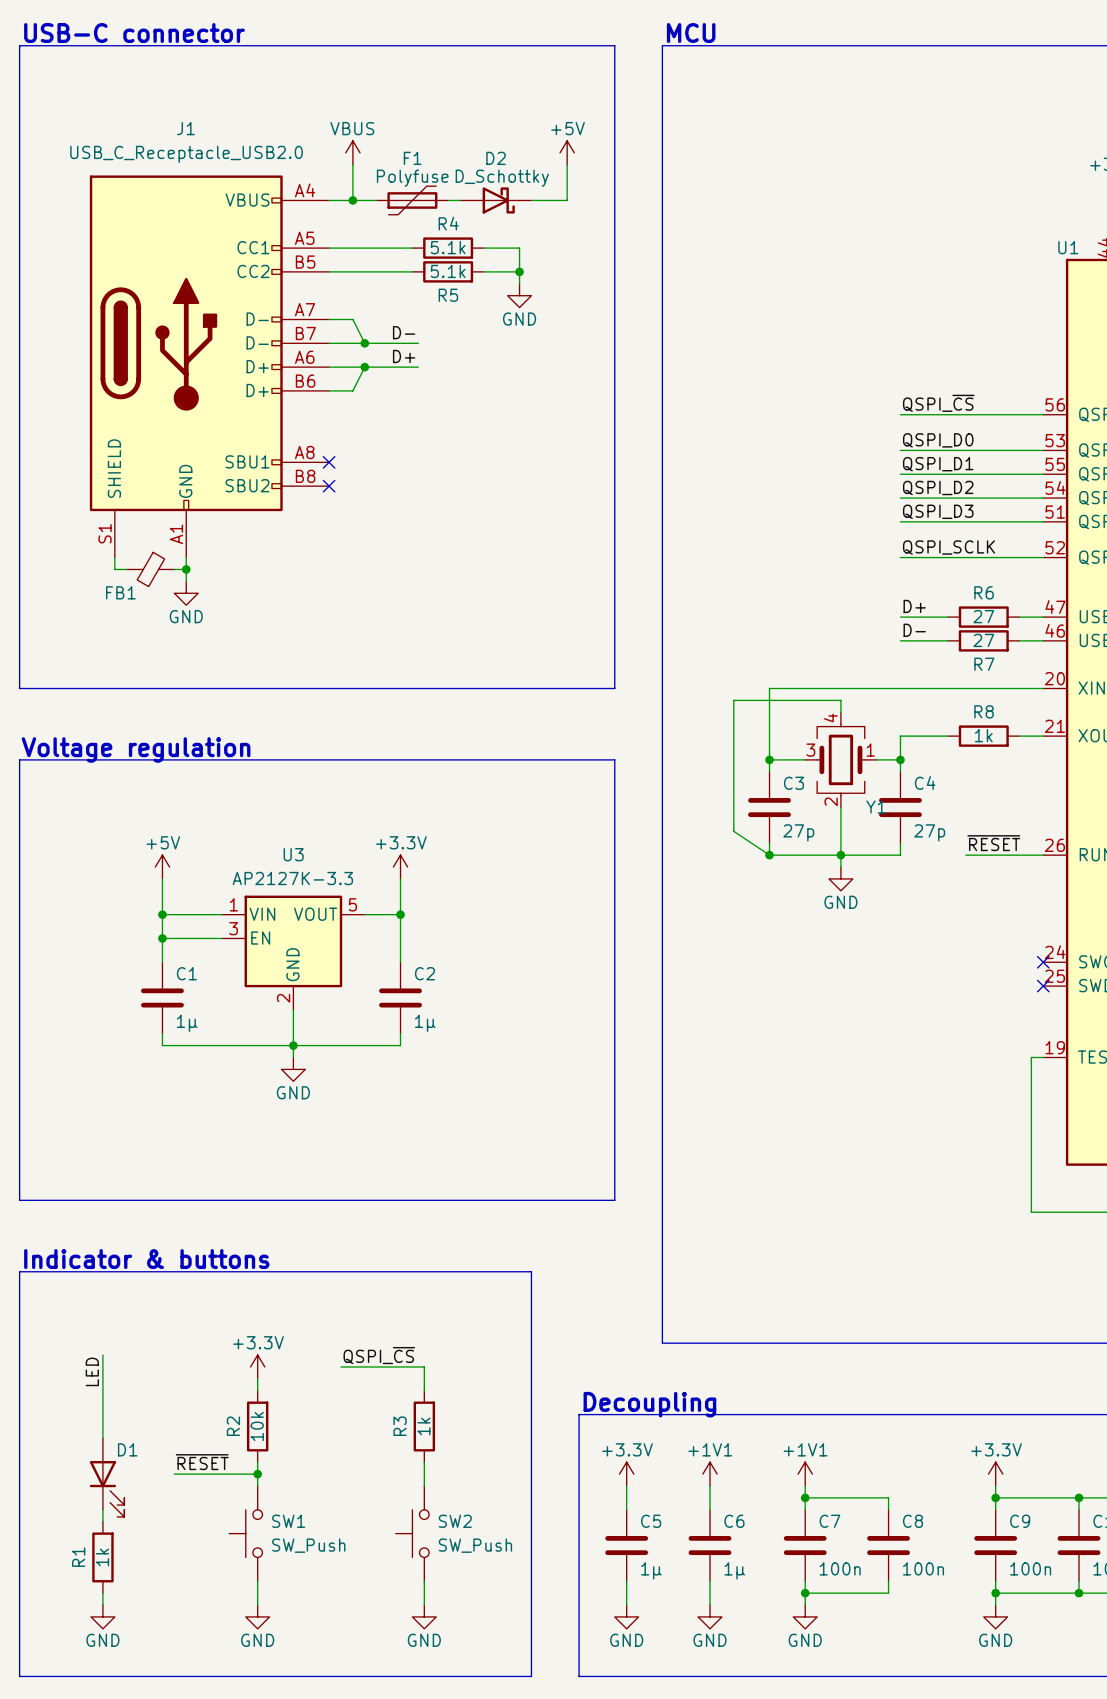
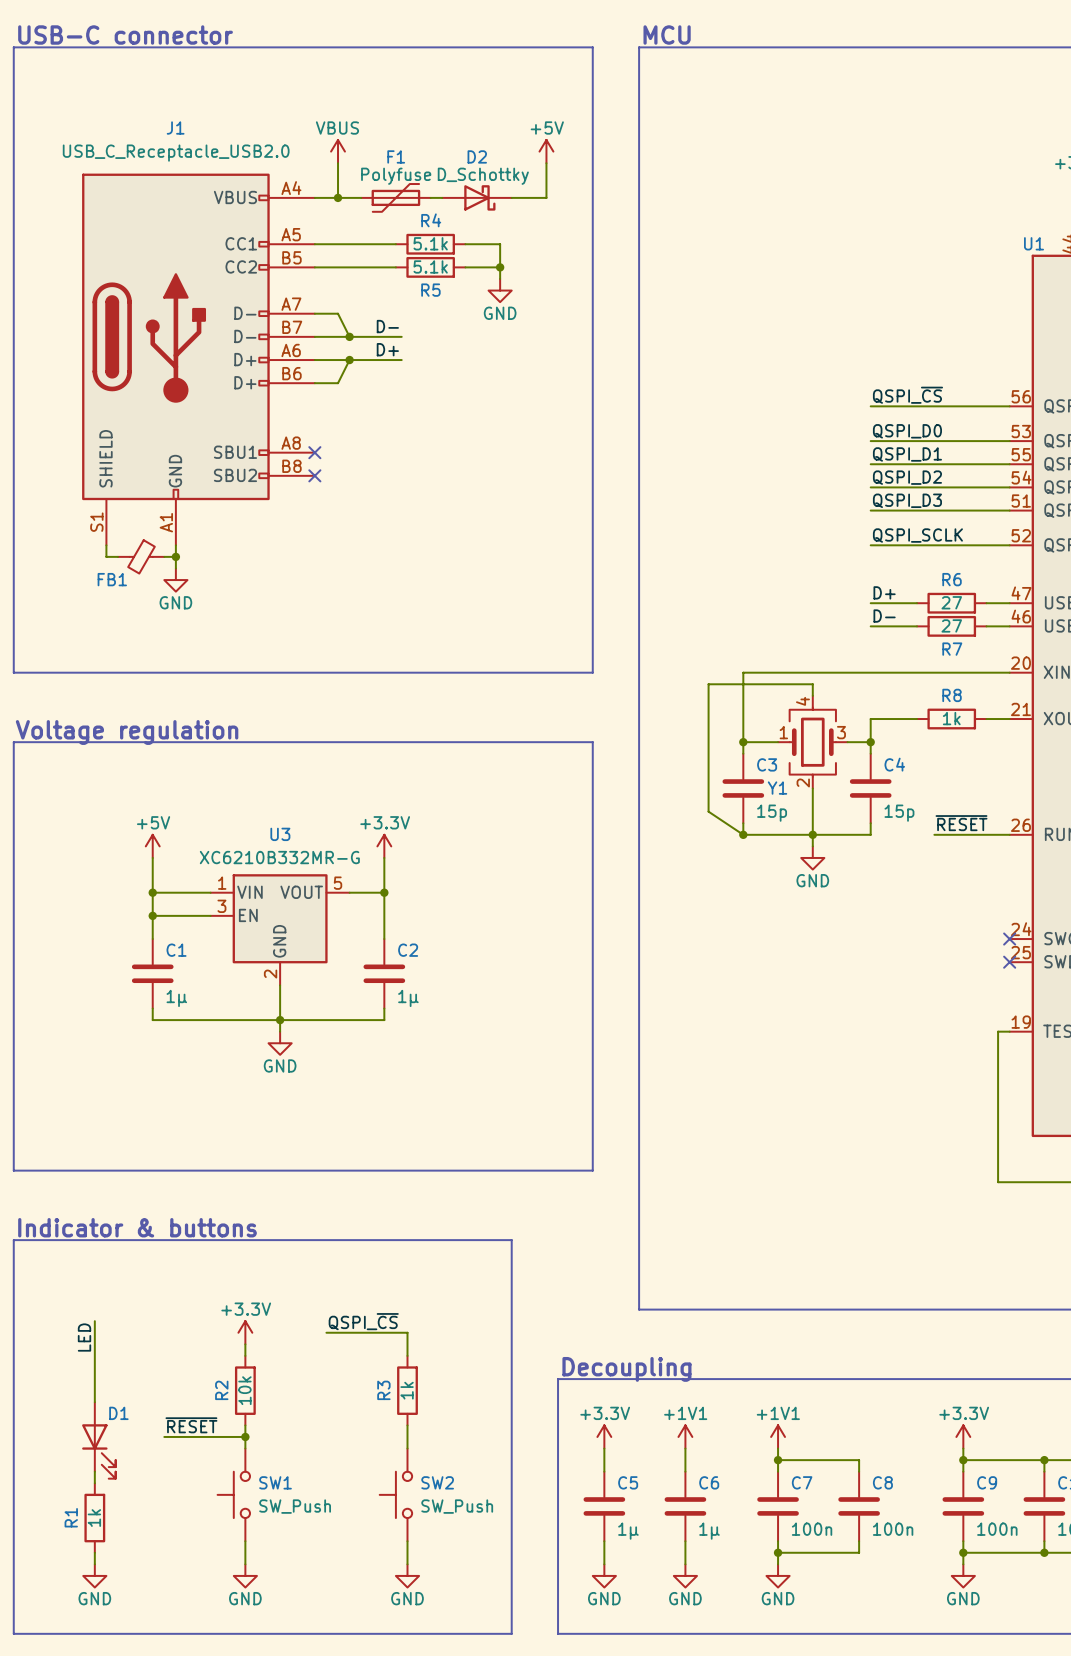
Y1 flip: as is (840, 759) -> left-right (812, 742)
C3 value: 27p (798, 832) -> 15p (772, 813)
C4 value: 27p (929, 832) -> 15p (899, 813)
U3 value: AP2127K-3.3 (292, 878) -> XC6210B332MR-G (279, 857)

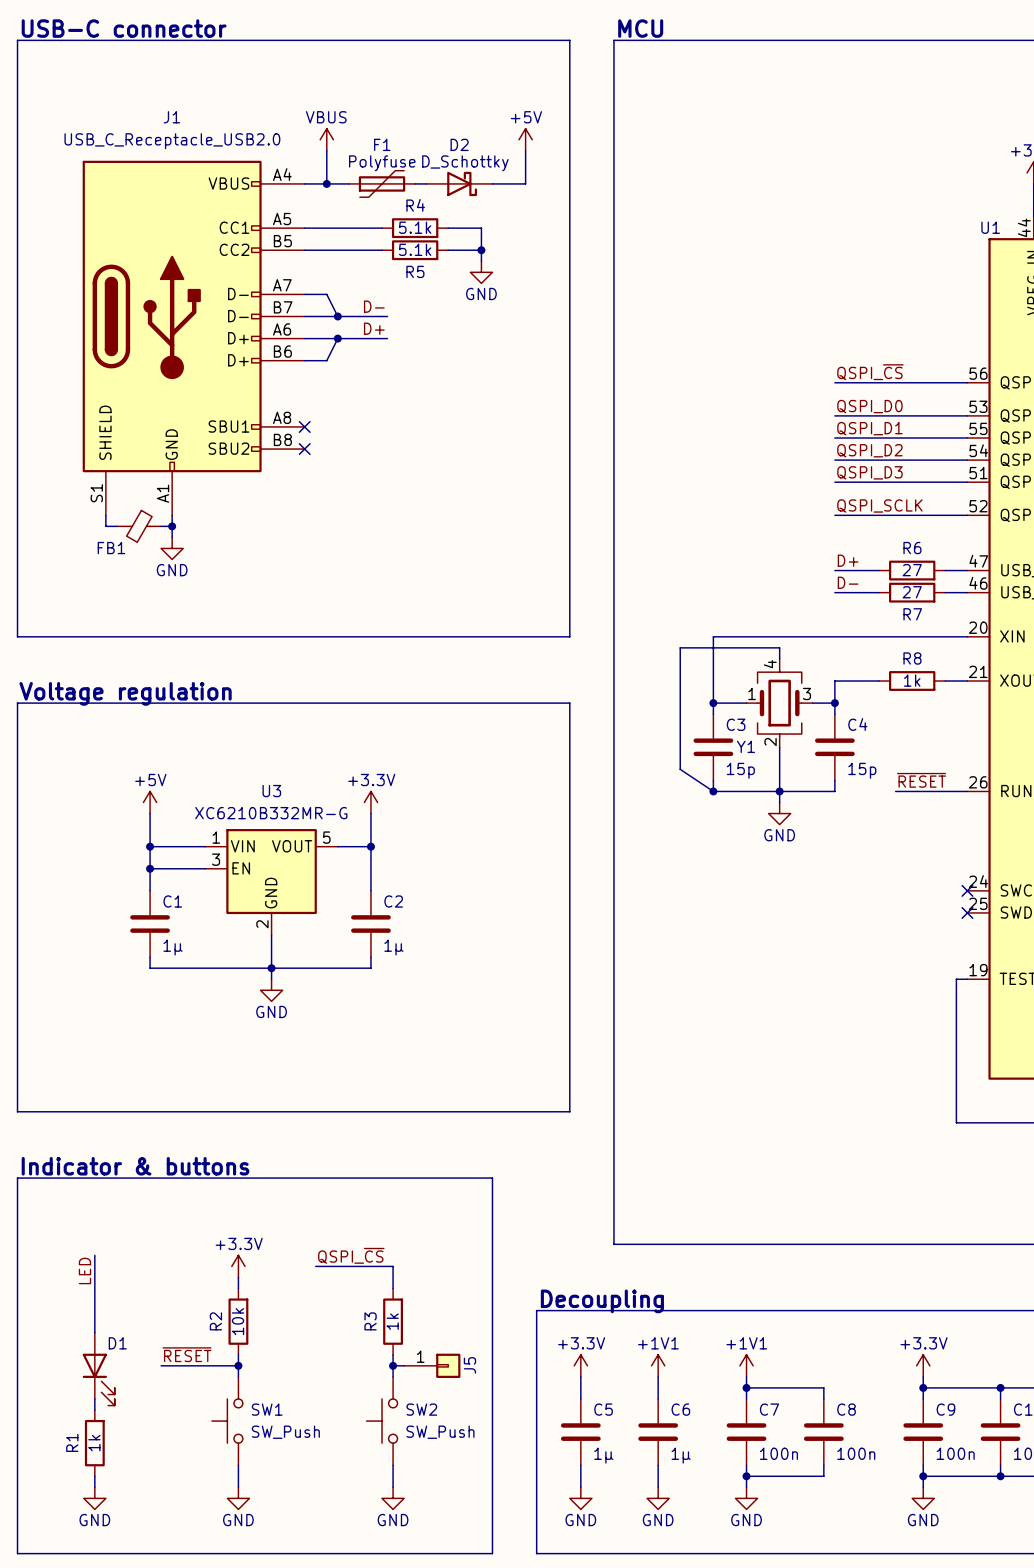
wire: none -> (393, 1365) (404, 1365)
junction: none -> (393, 1365)
J5: none -> (432, 1365)

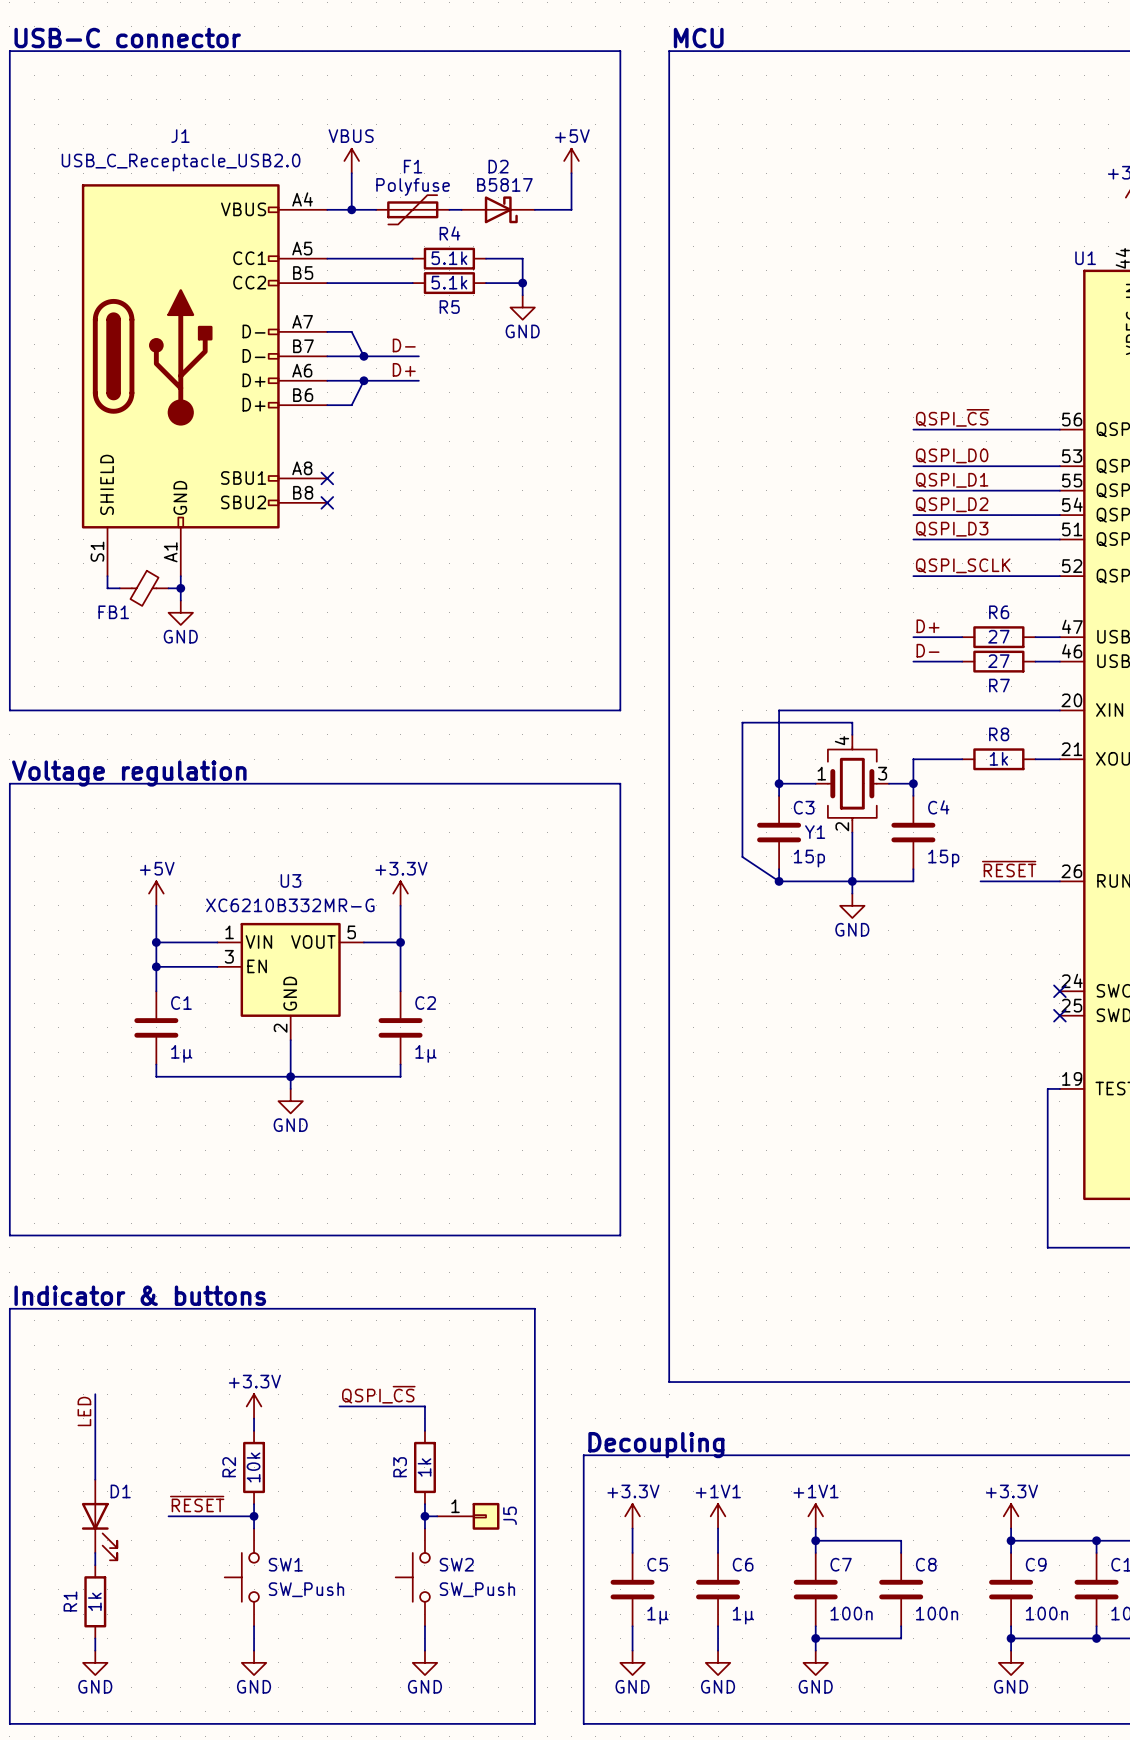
D2 value: D_Schottky (465, 163) -> B5817 (504, 184)

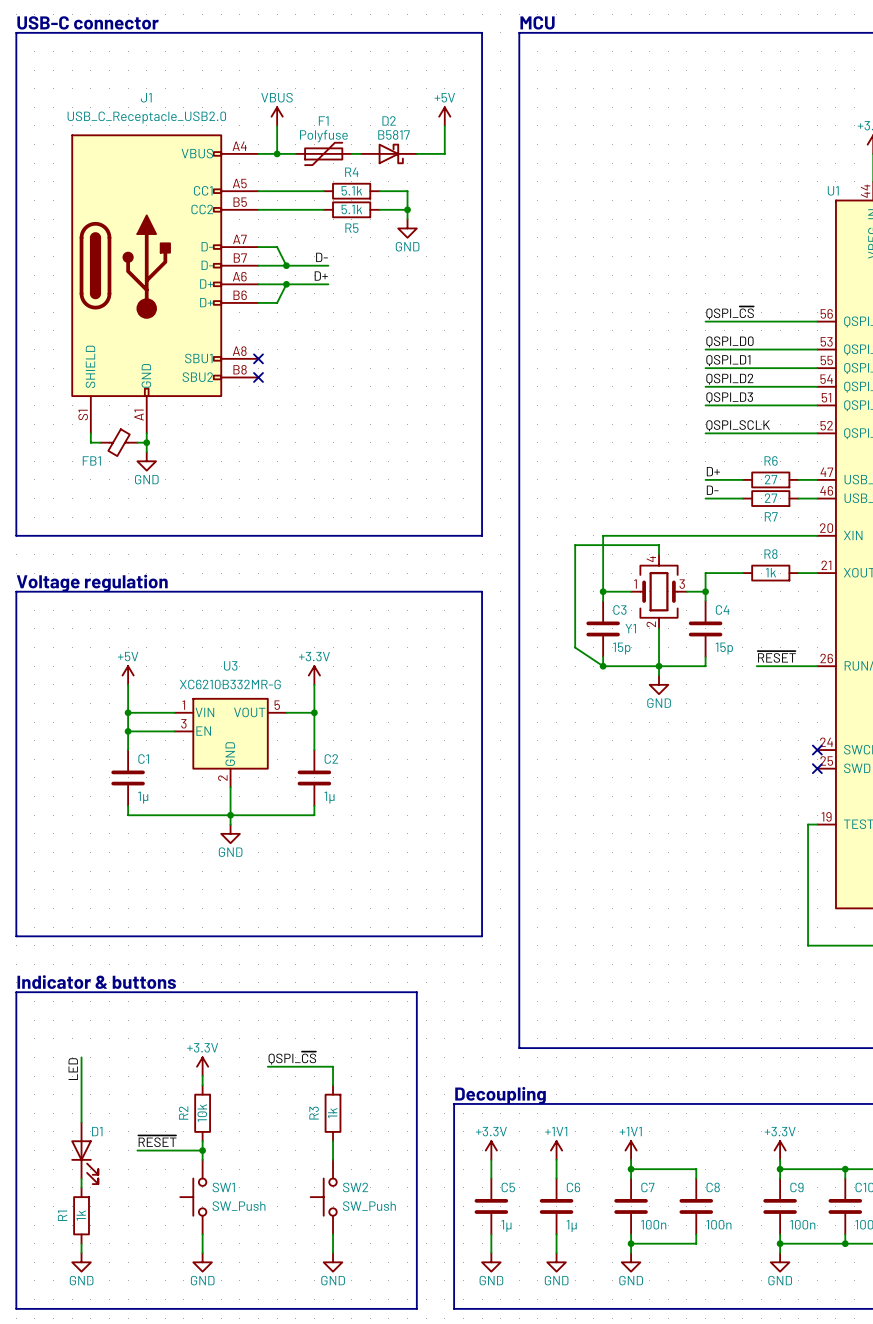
wire: (424, 1516) (437, 1516) -> none
junction: (424, 1516) -> none
J5: (468, 1516) -> none

